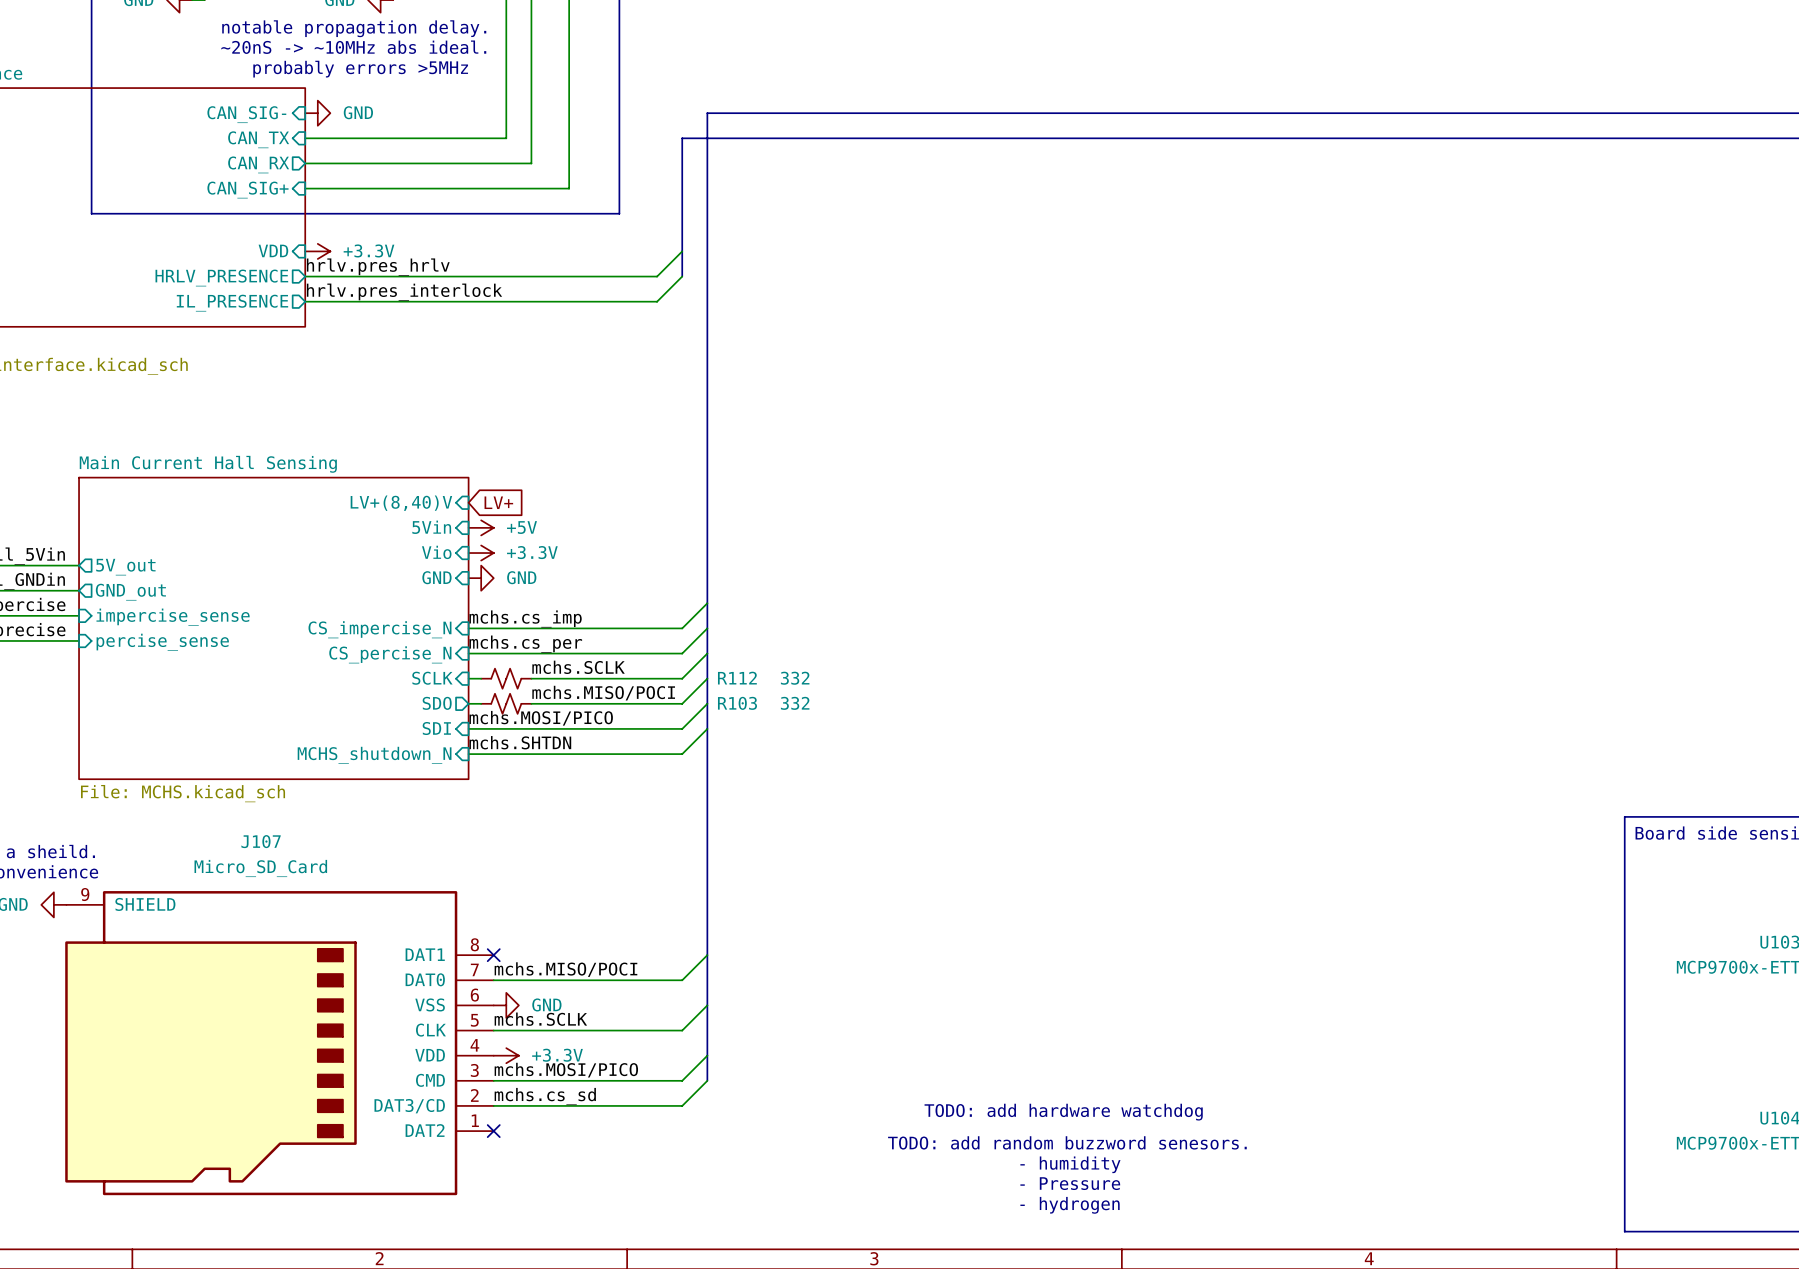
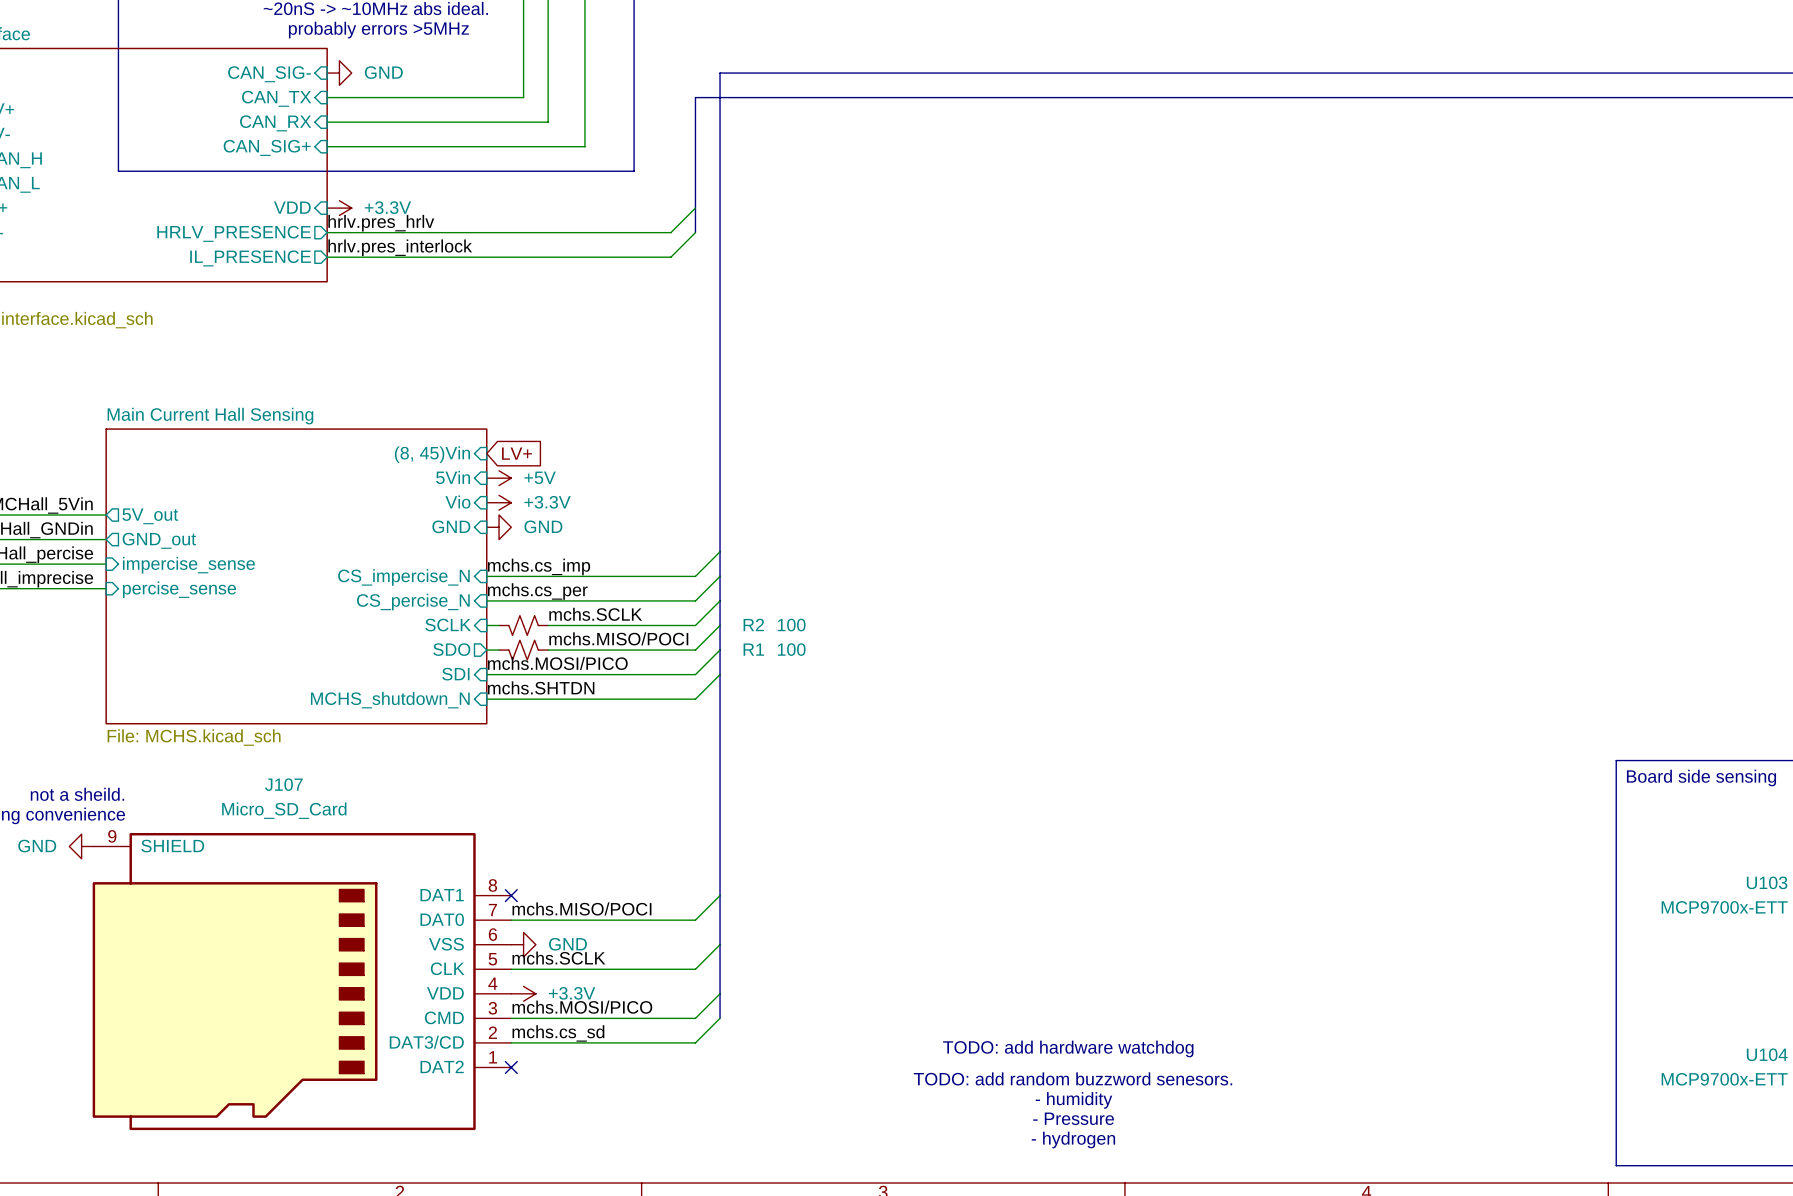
sheet pin shape: output (258, 164) -> input (275, 123)
sheet pin: LV+(8,40)V (401, 503) -> (8, 45)Vin (432, 454)
R112: 332 (506, 678) -> none
R2: none -> 100 (523, 625)
R103: 332 (506, 703) -> none
R1: none -> 100 (523, 650)

